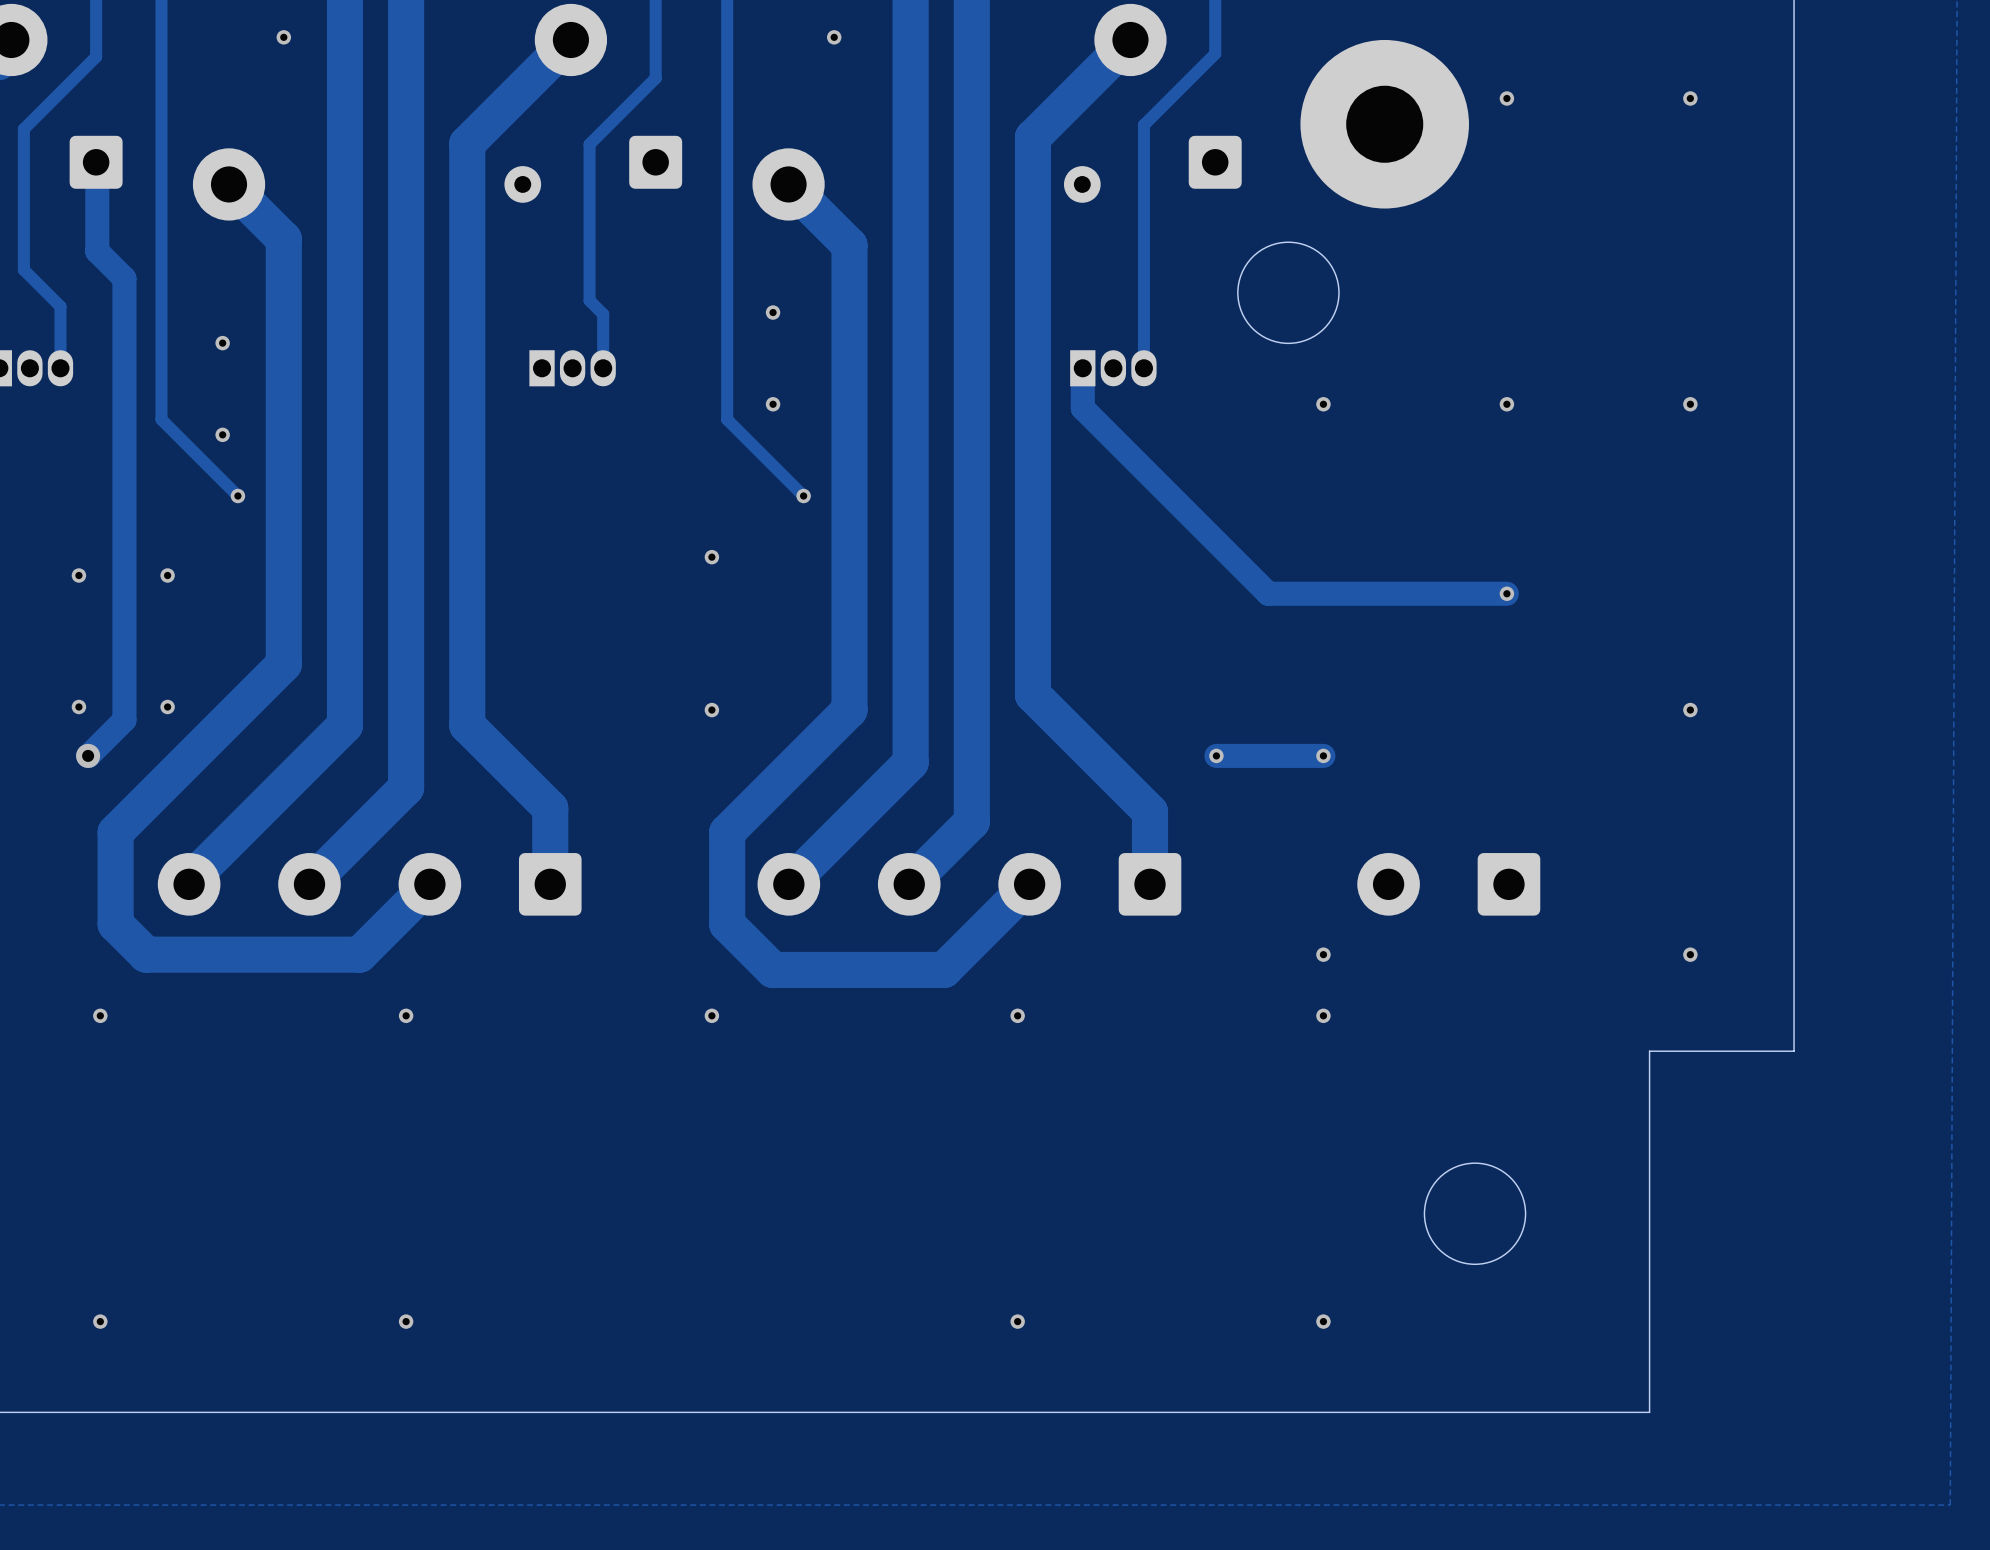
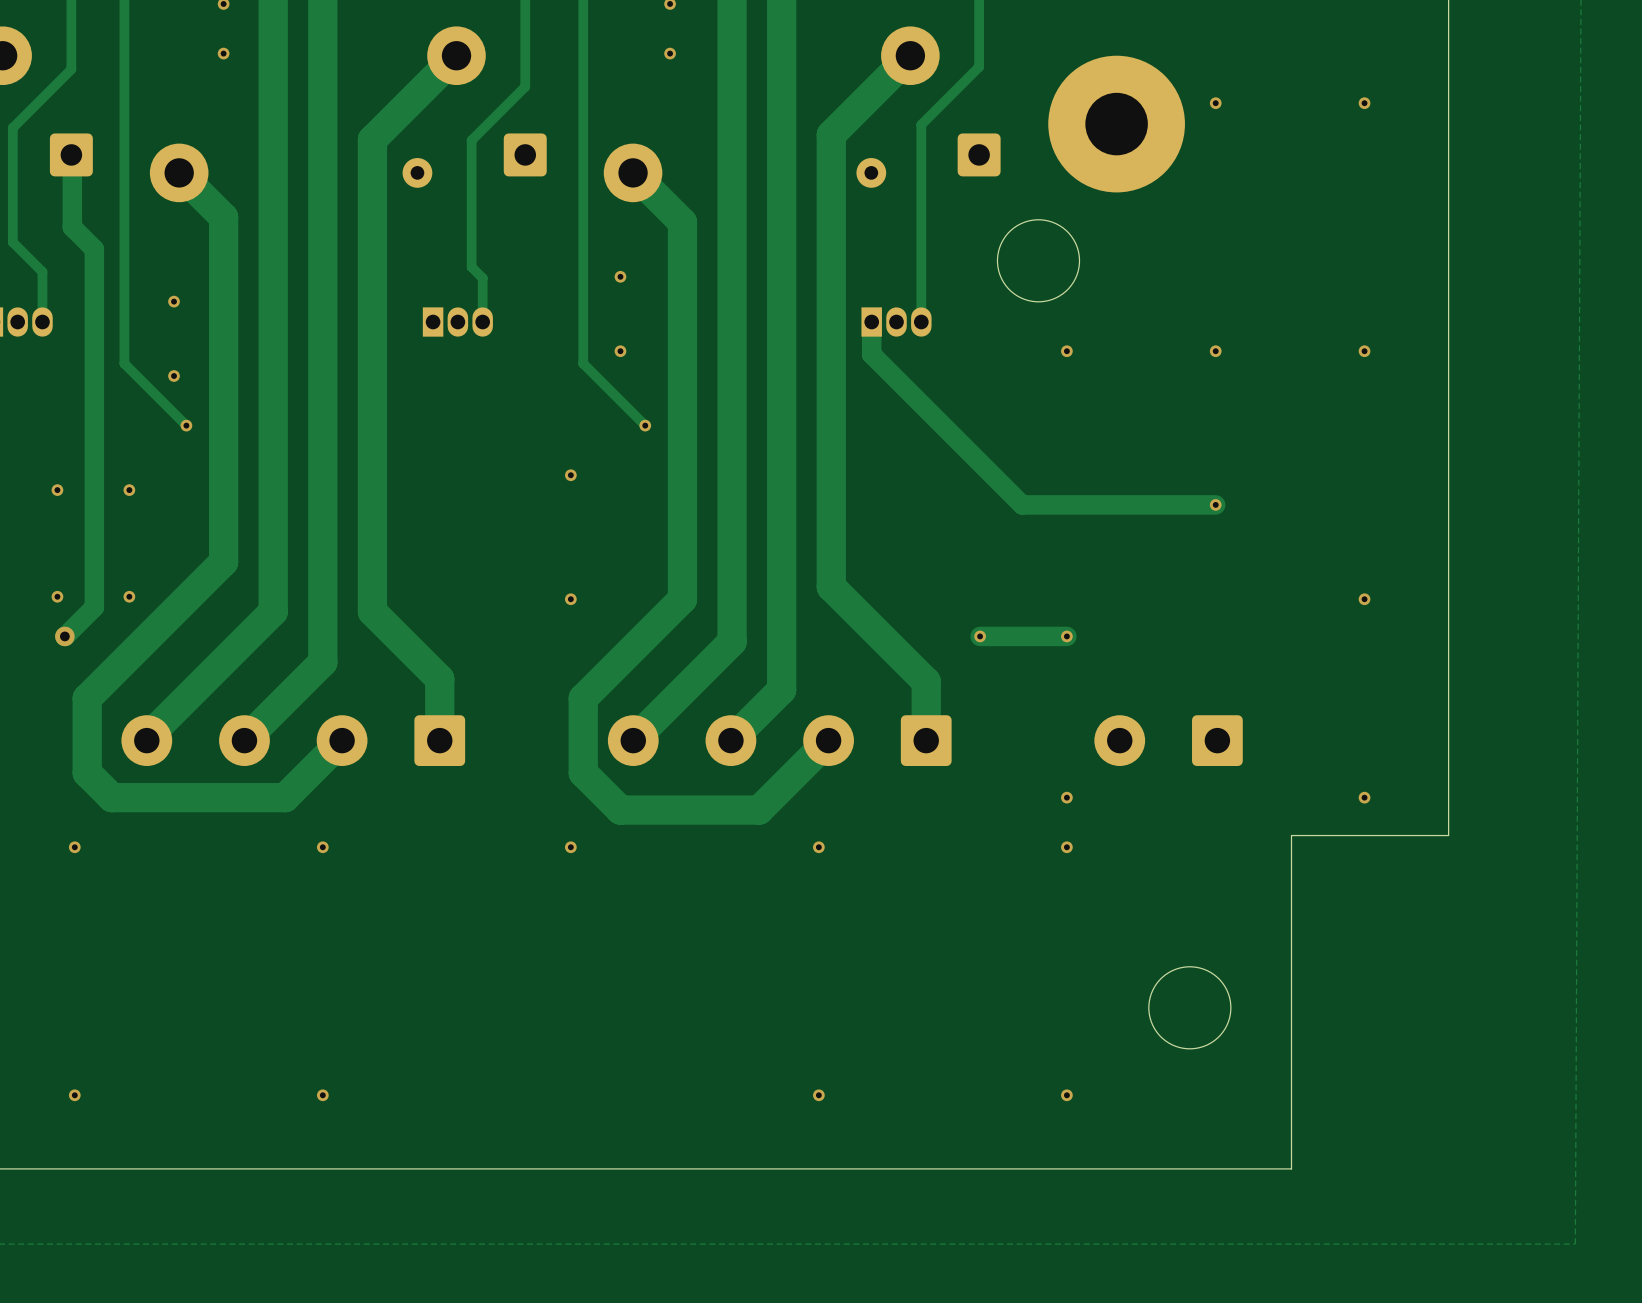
board edge: (1794, 1001) (1794, 1051) (1649, 1051) (1649, 1412) (1600, 1412) -> (1448, 835) (1291, 835) (1291, 1168)

